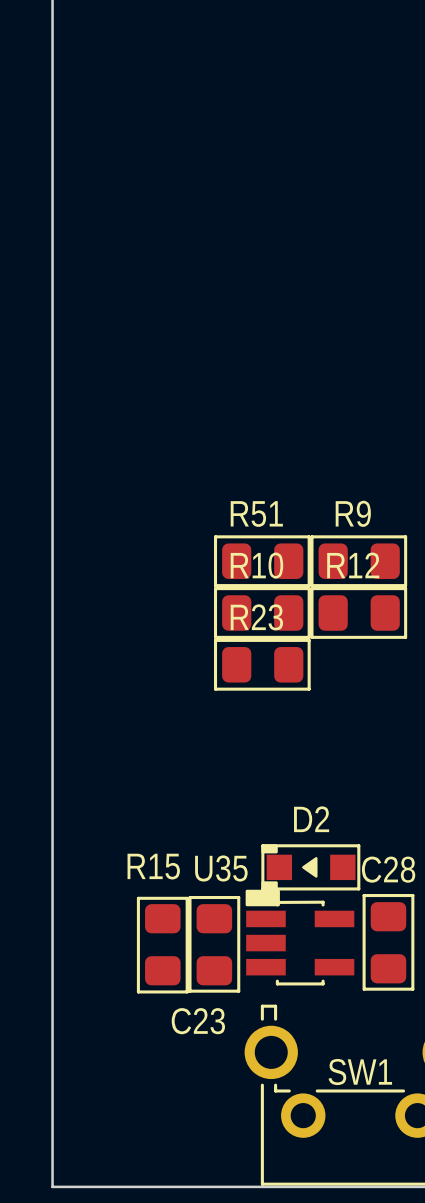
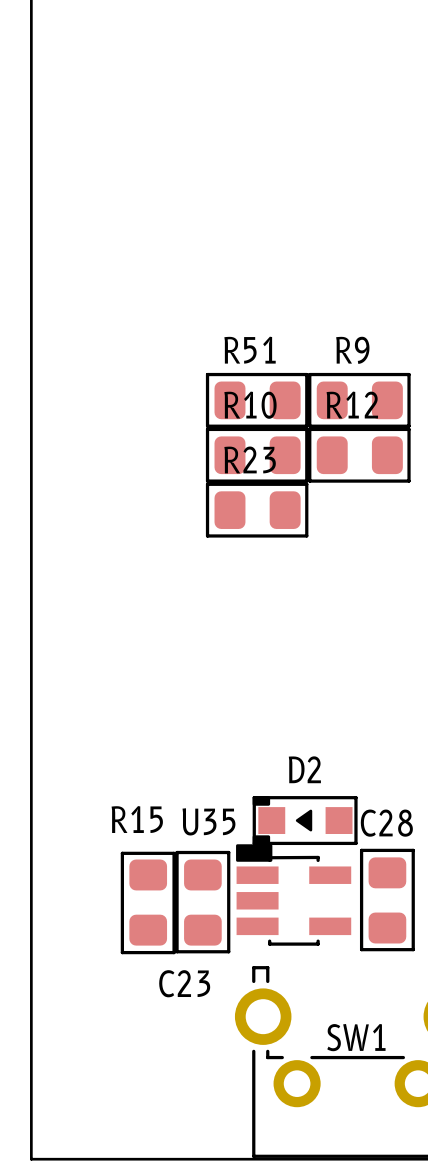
R51 position: (262, 561) -> (257, 400)
R9 position: (358, 561) -> (359, 400)
R10 position: (262, 612) -> (257, 455)
R12 position: (358, 612) -> (359, 455)
R23 position: (262, 664) -> (257, 510)

